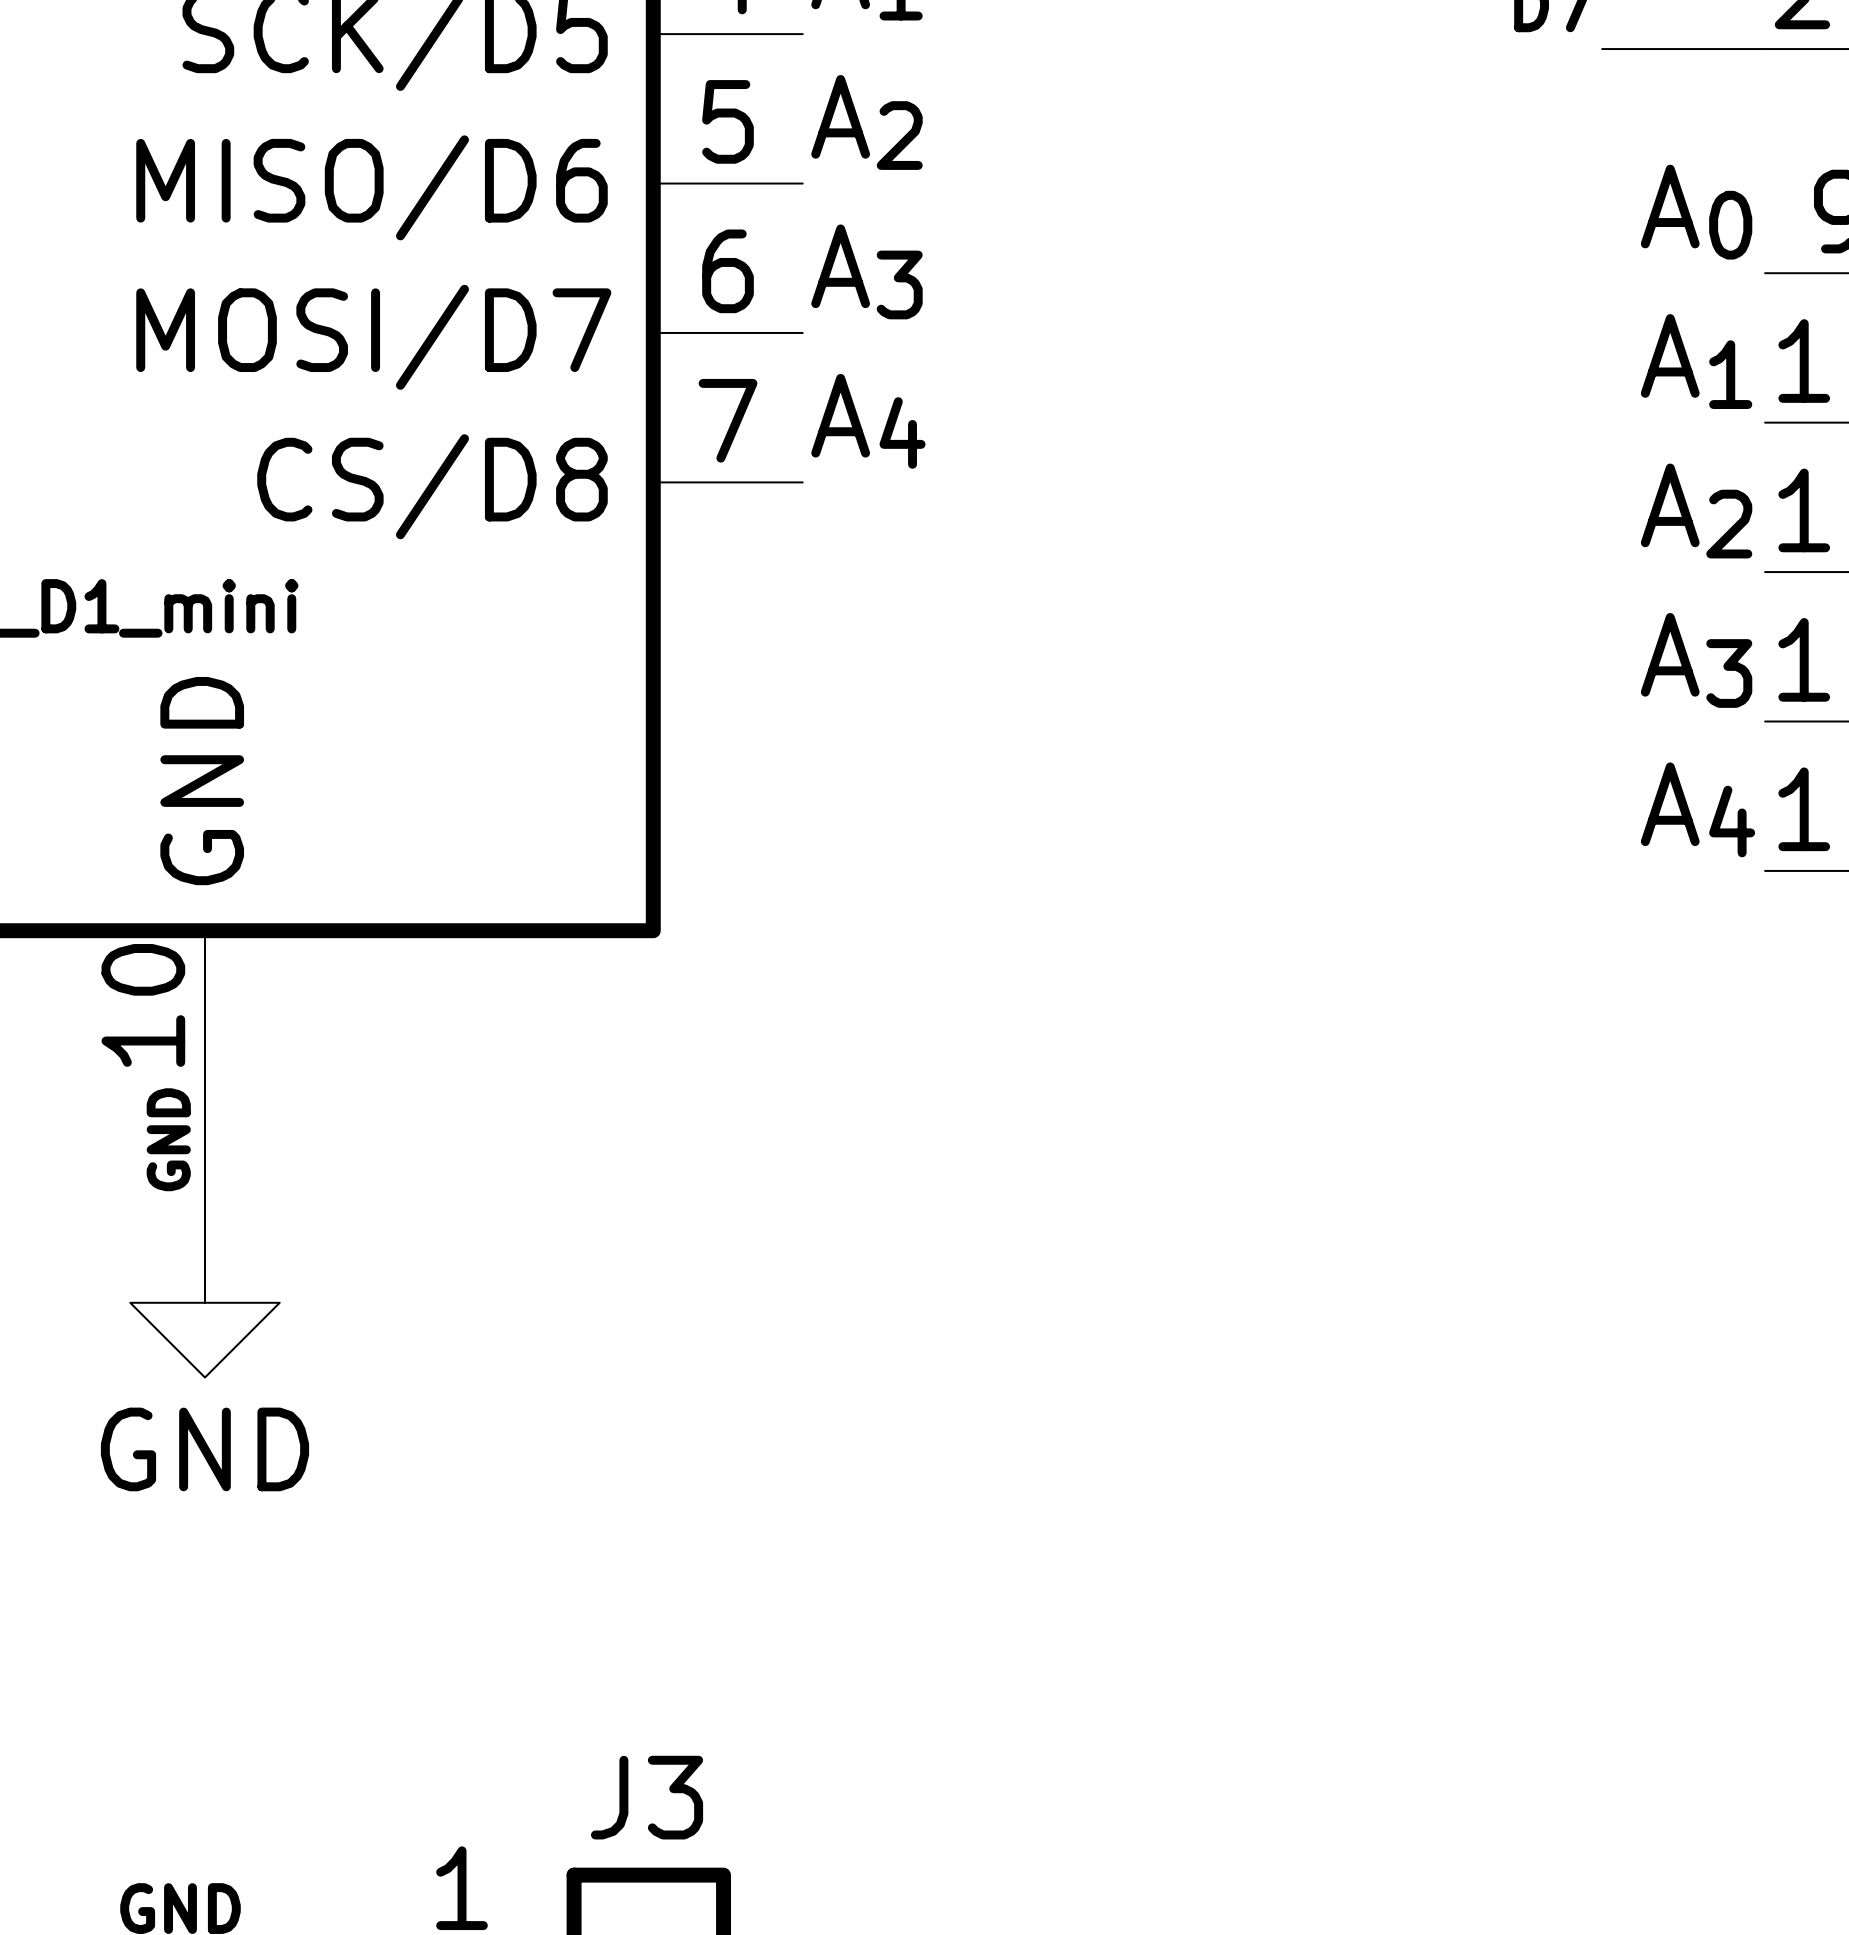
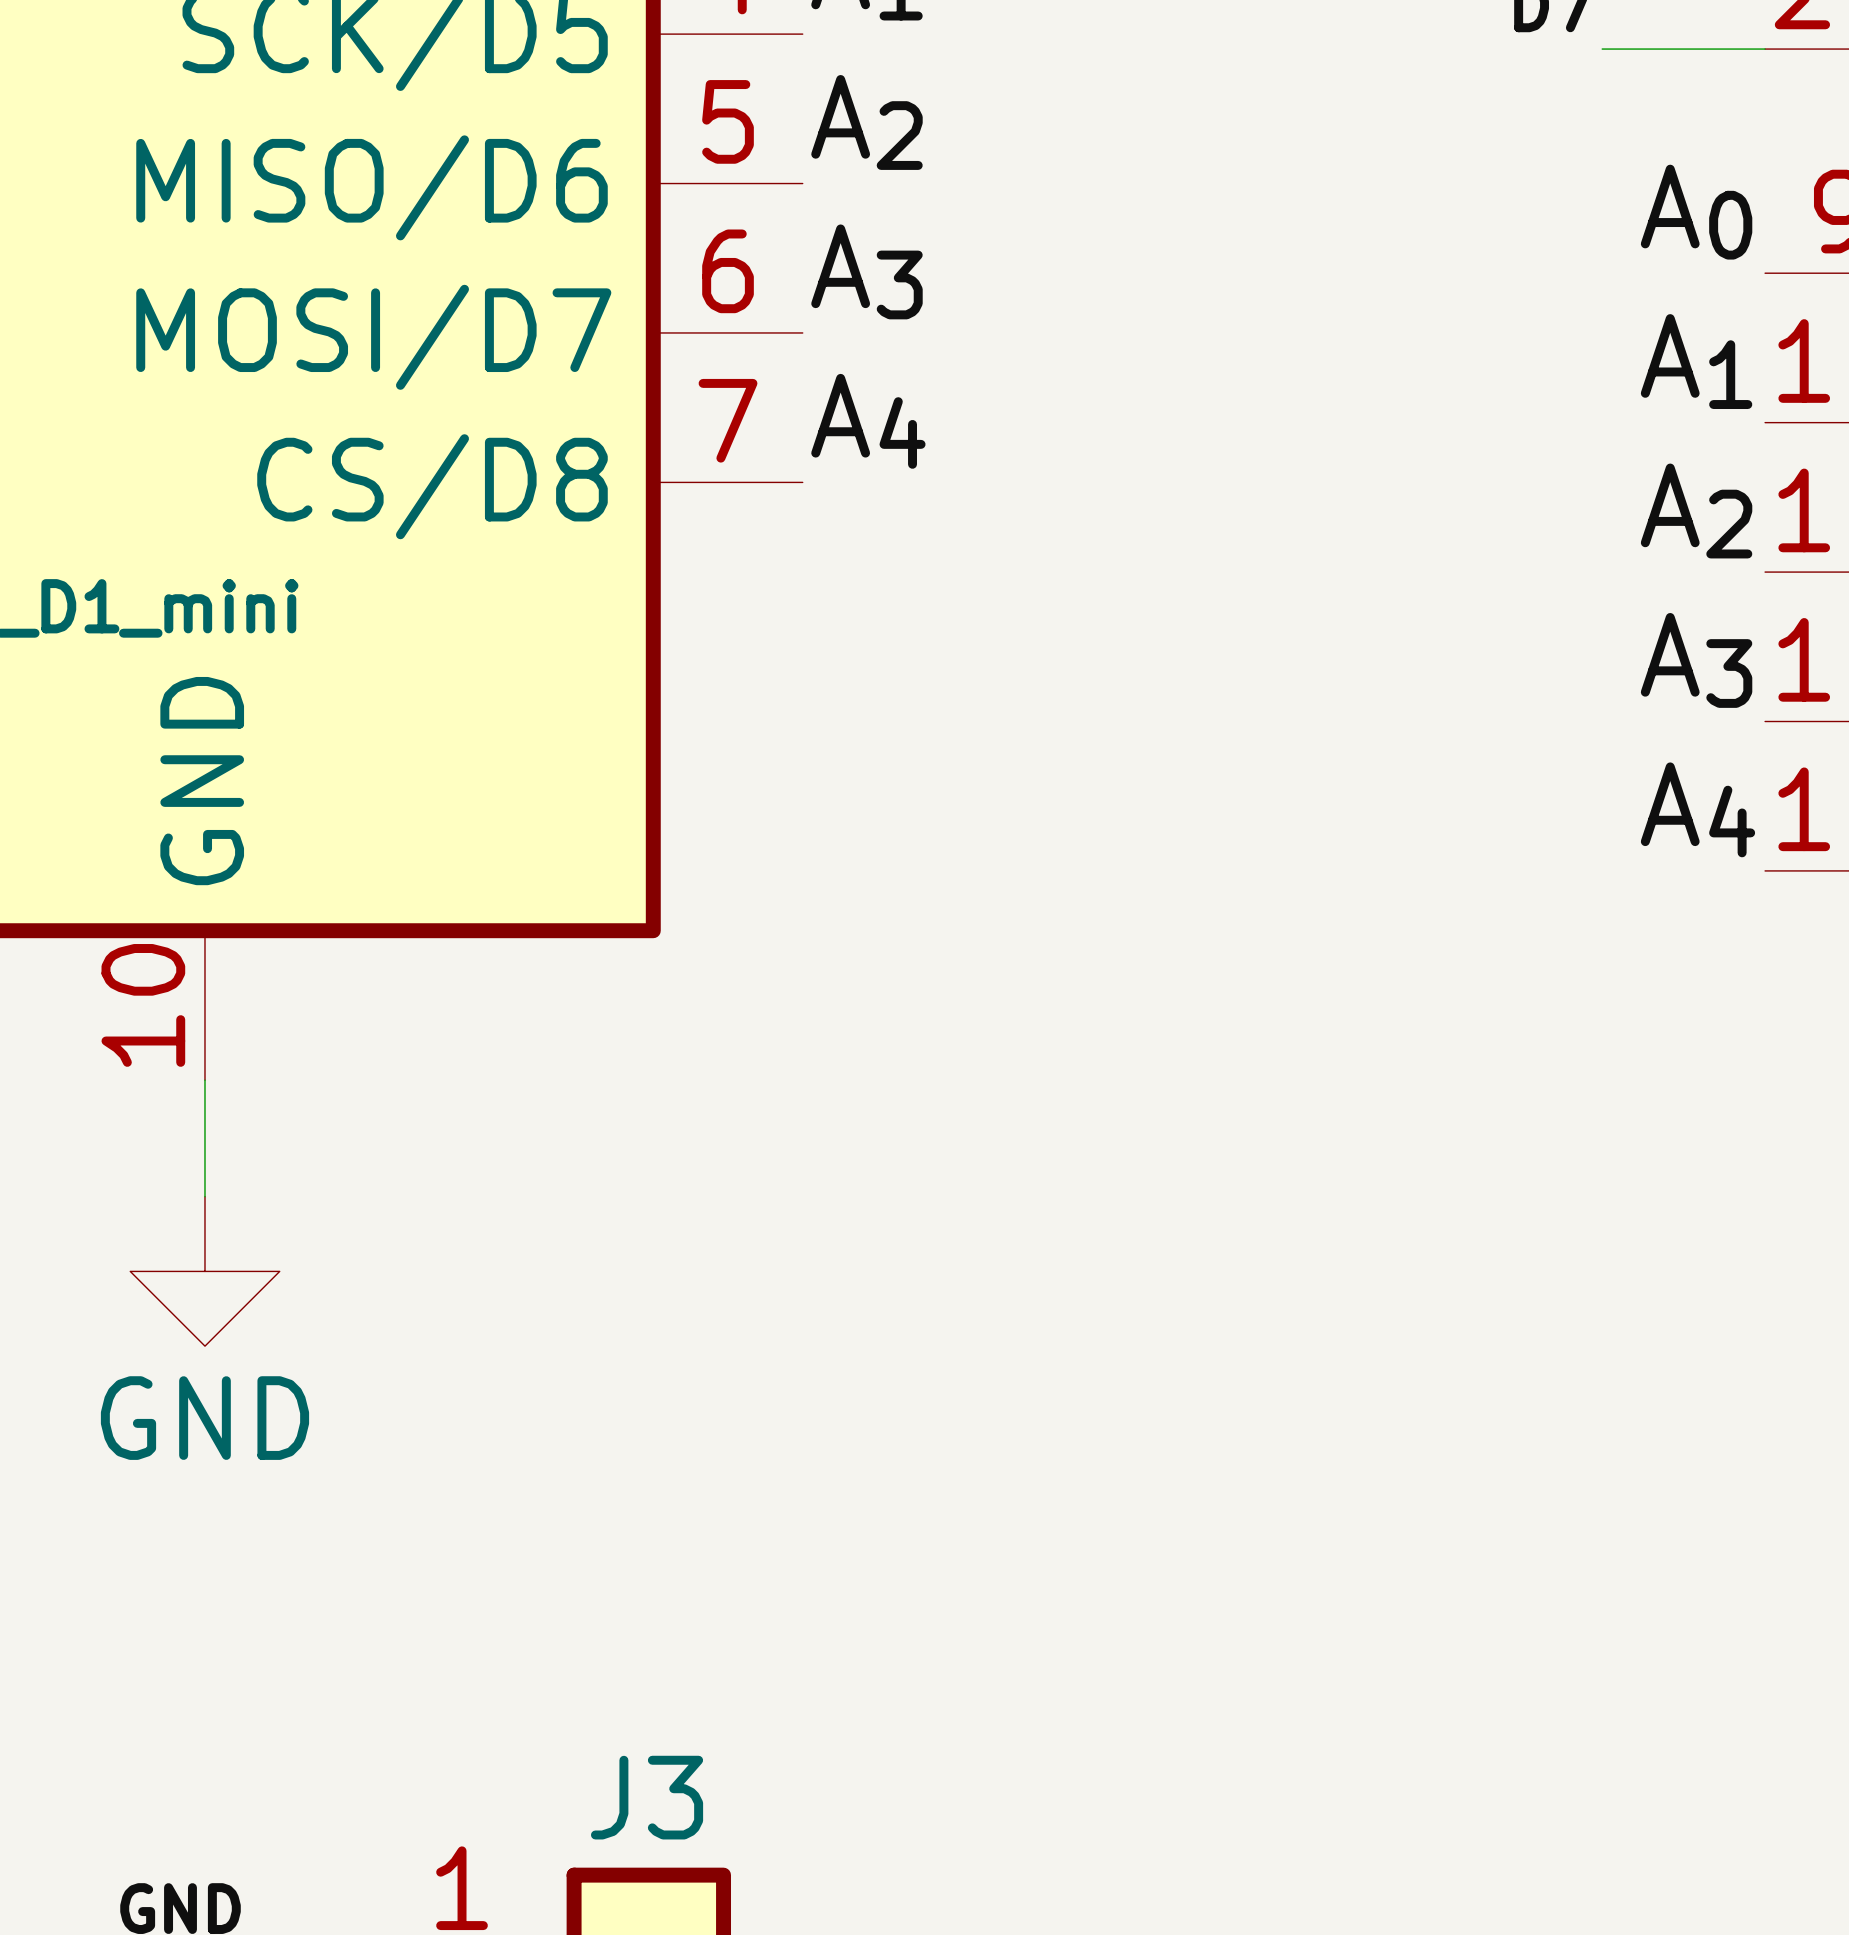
label: GND (168, 1139) -> none
power symbol position: GND (204, 1302) -> GND (204, 1271)

